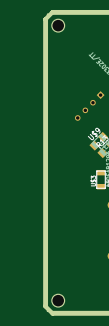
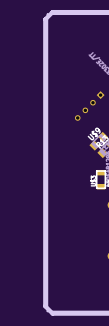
hole: (58, 25) -> none
hole: (58, 300) -> none

